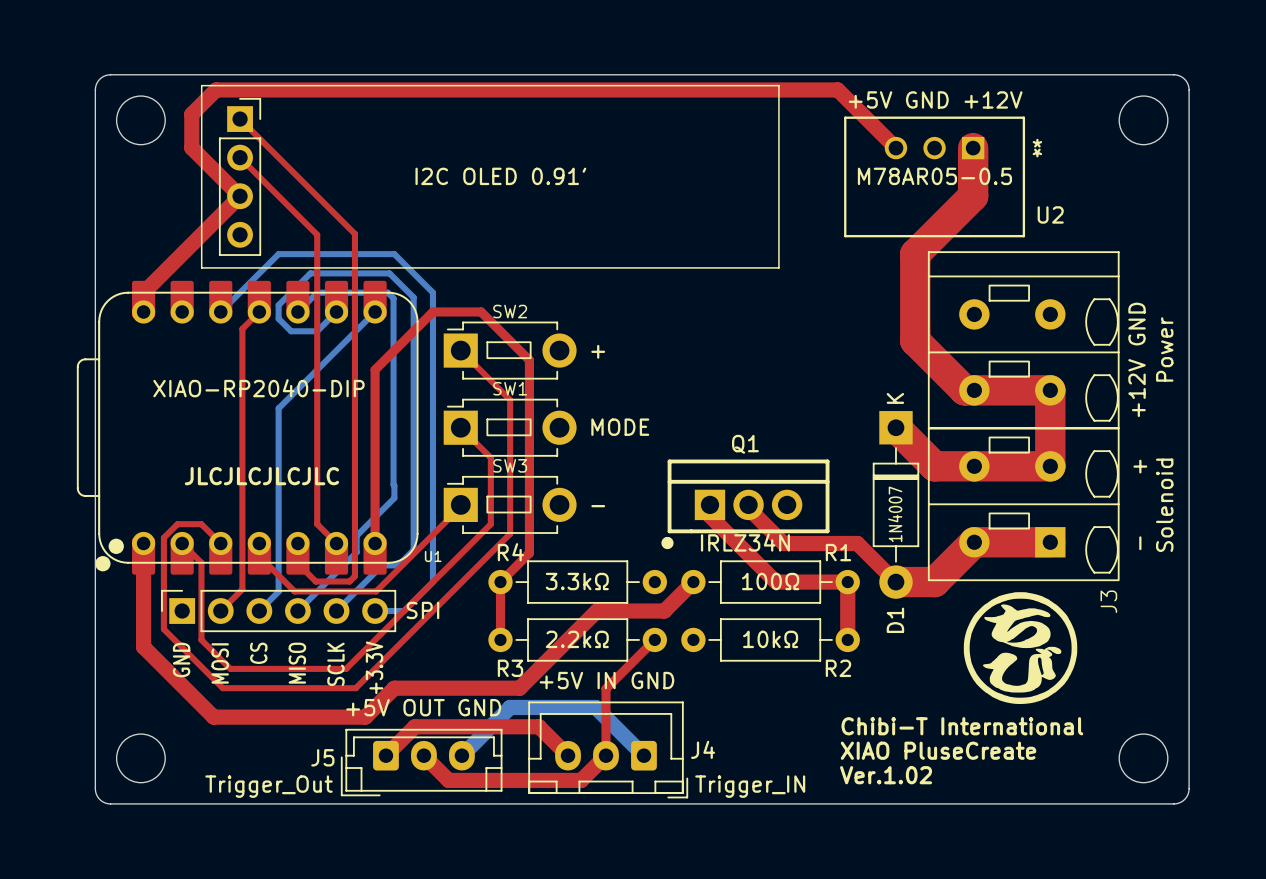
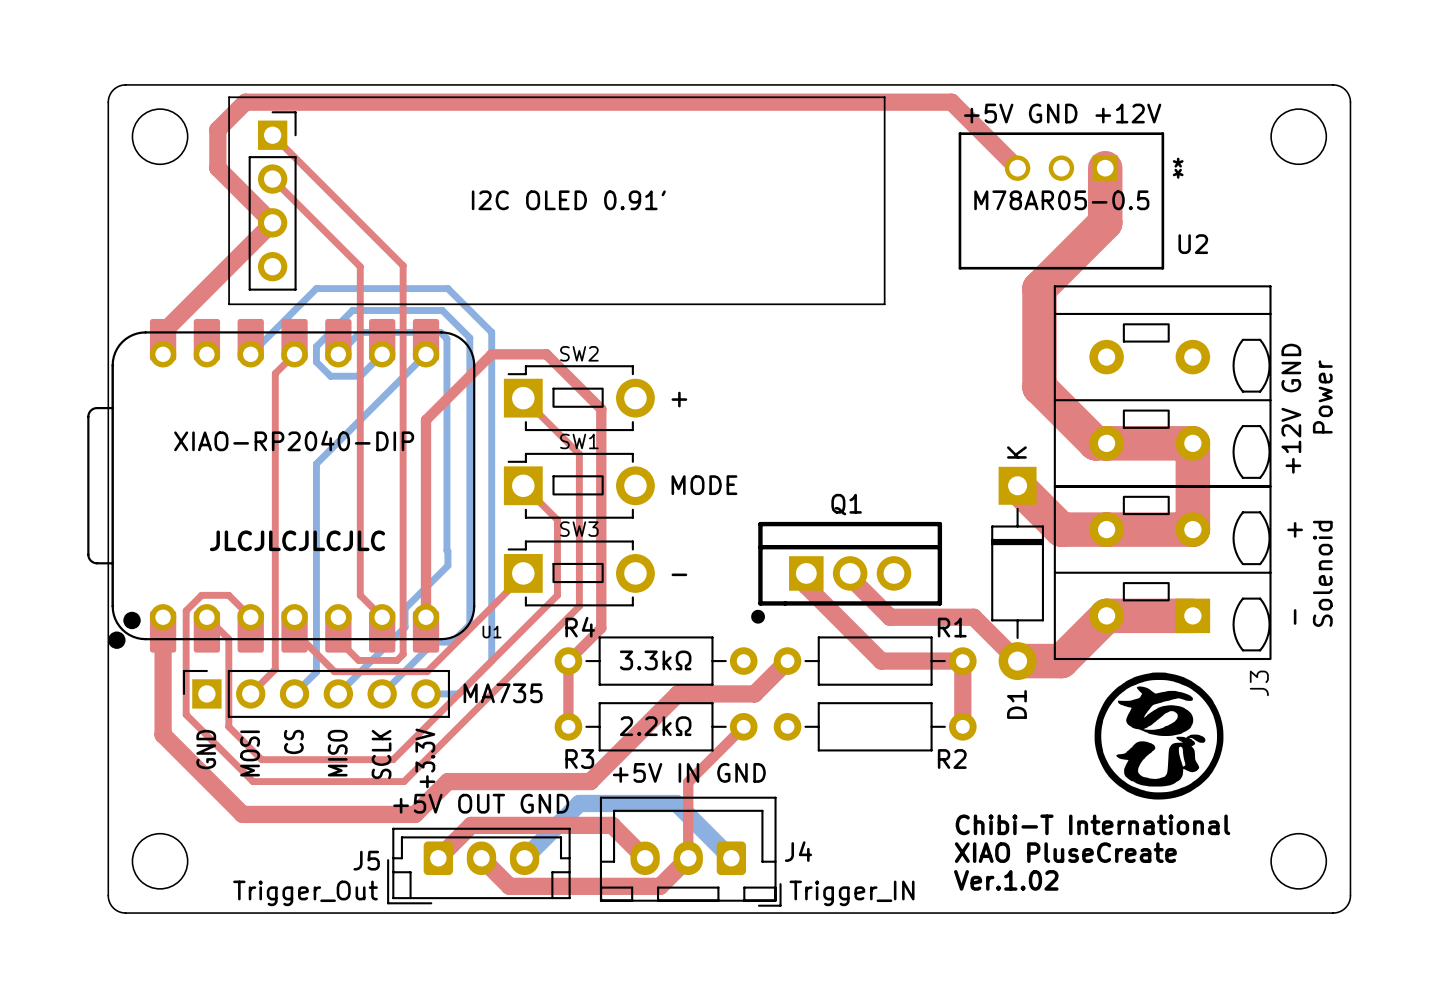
D1 value: 1N4007 (895, 514) -> none
Q1 value: IRLZ34N (745, 542) -> none
R1 value: 100Ω (770, 581) -> none
part value: SPI (422, 610) -> MA735 (503, 693)
R2 value: 10kΩ (770, 639) -> none

